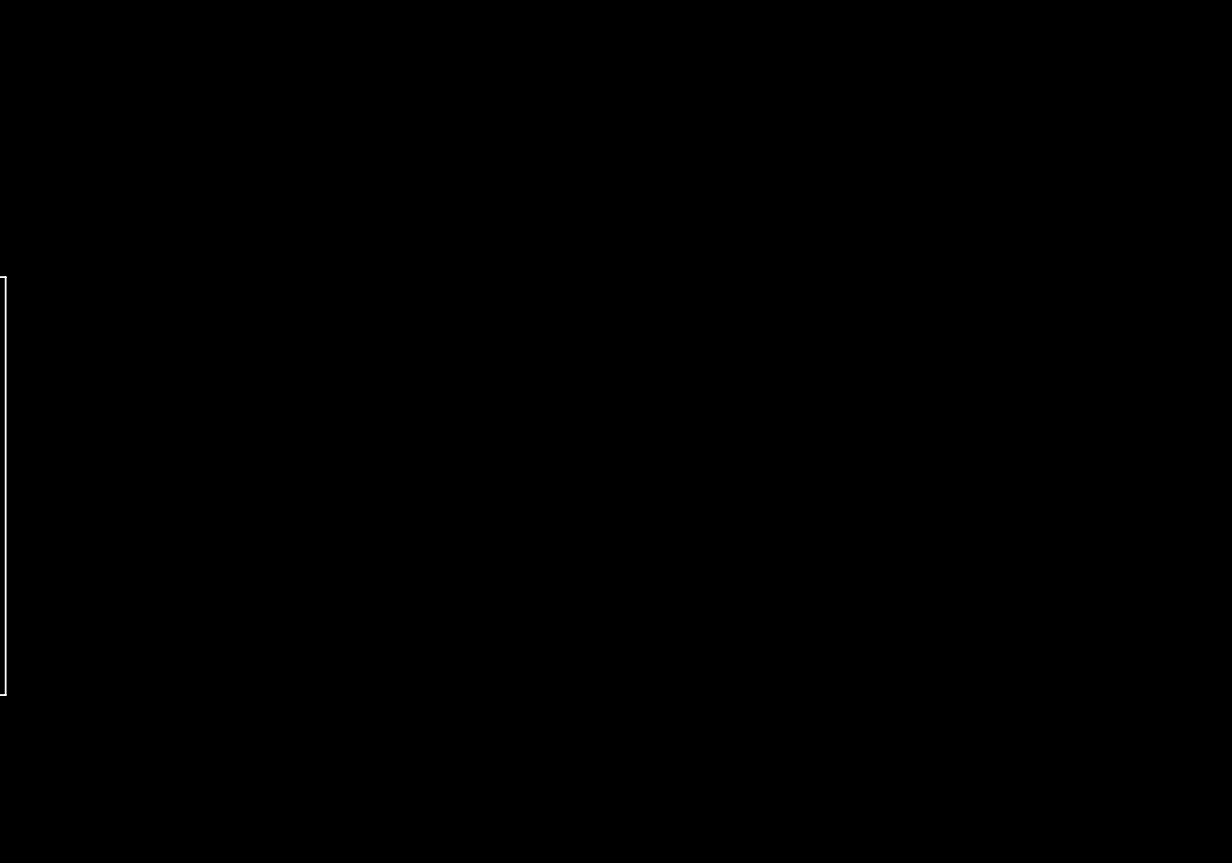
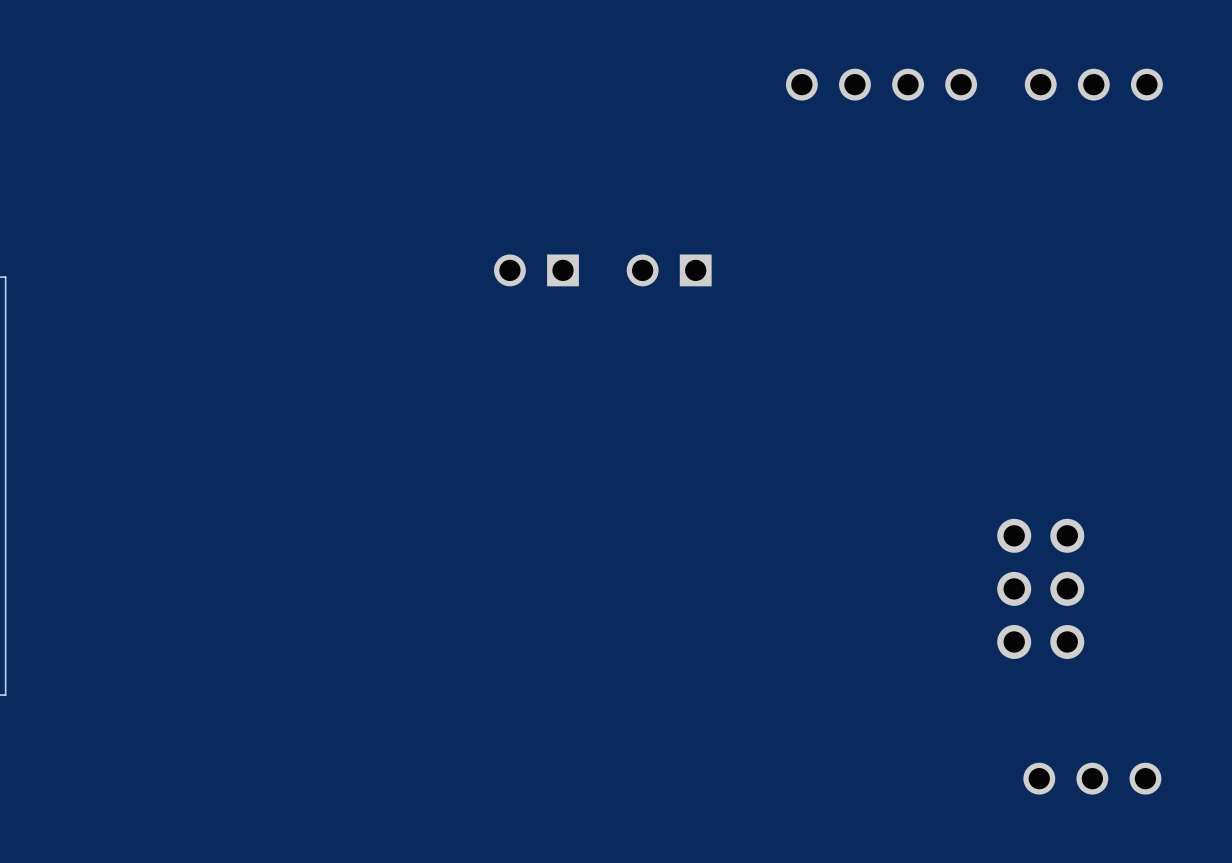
part: none -> (881, 84)
part: none -> (1093, 84)
part: none -> (536, 270)
part: none -> (669, 270)
part: none -> (1040, 588)
part: none -> (1092, 778)

